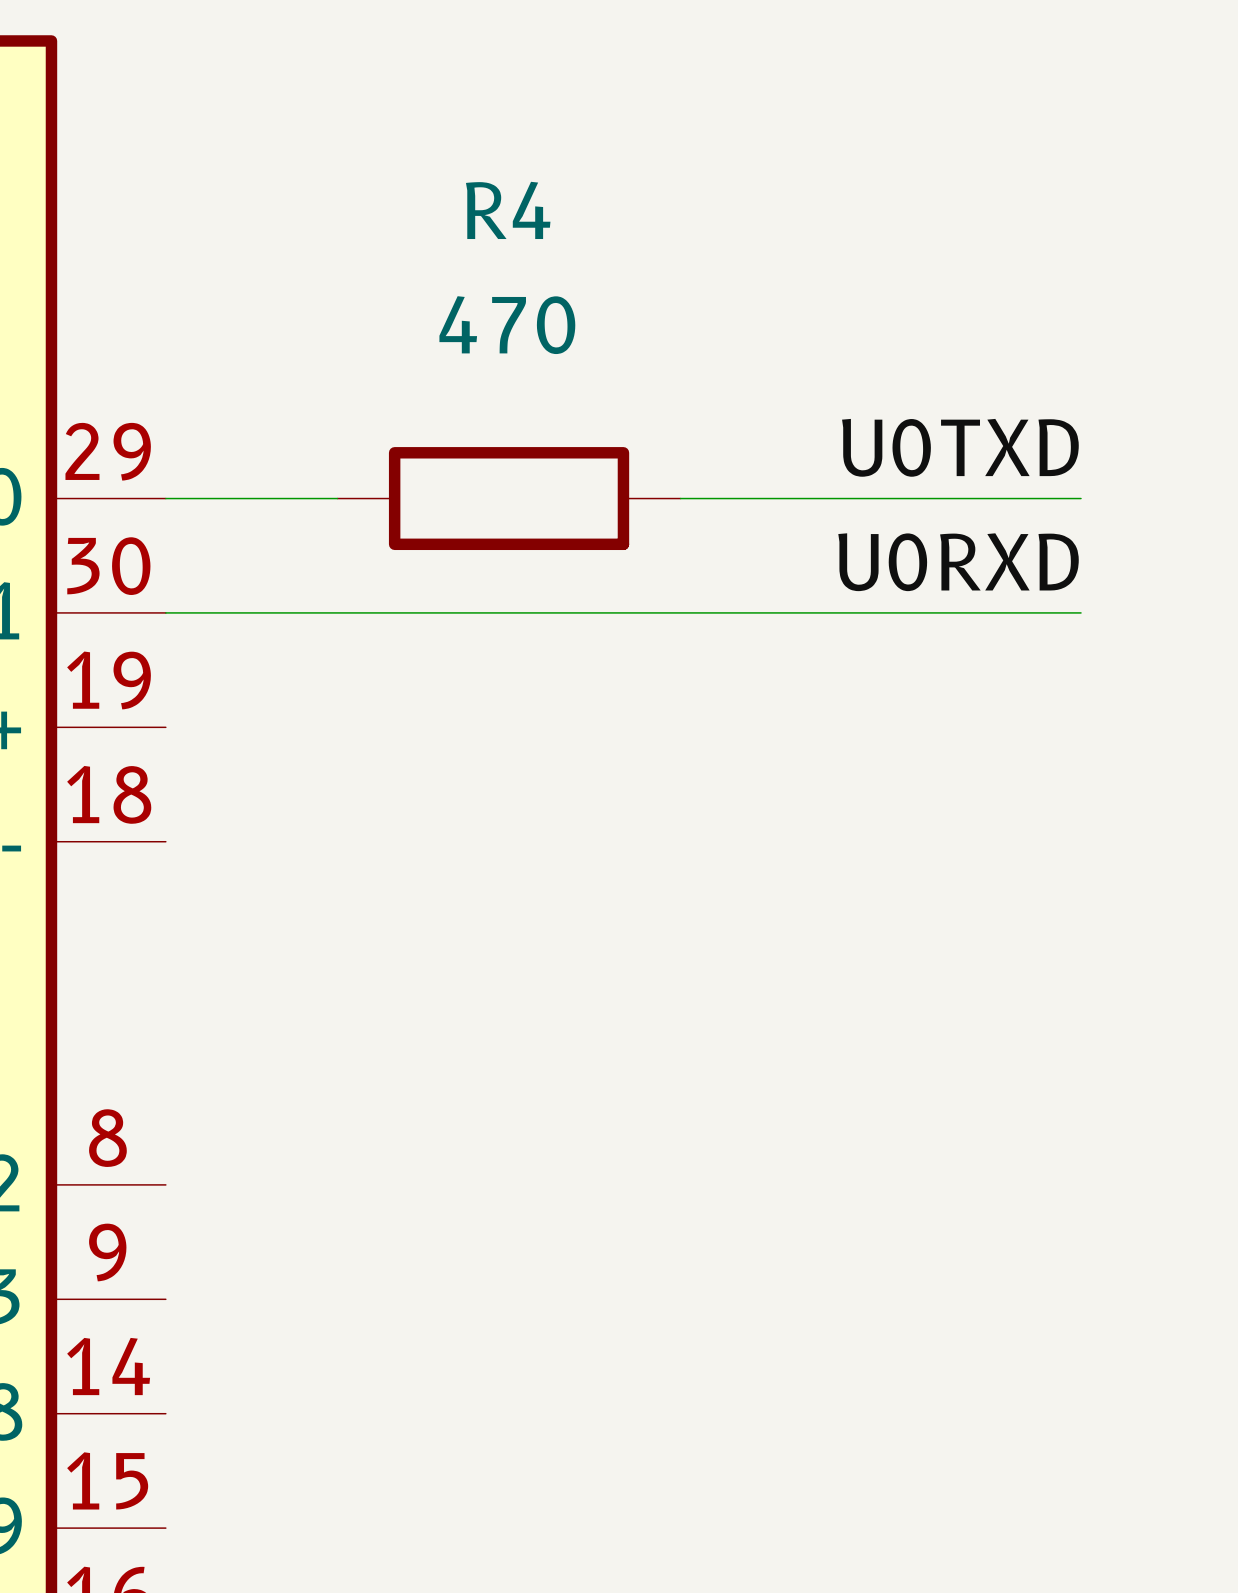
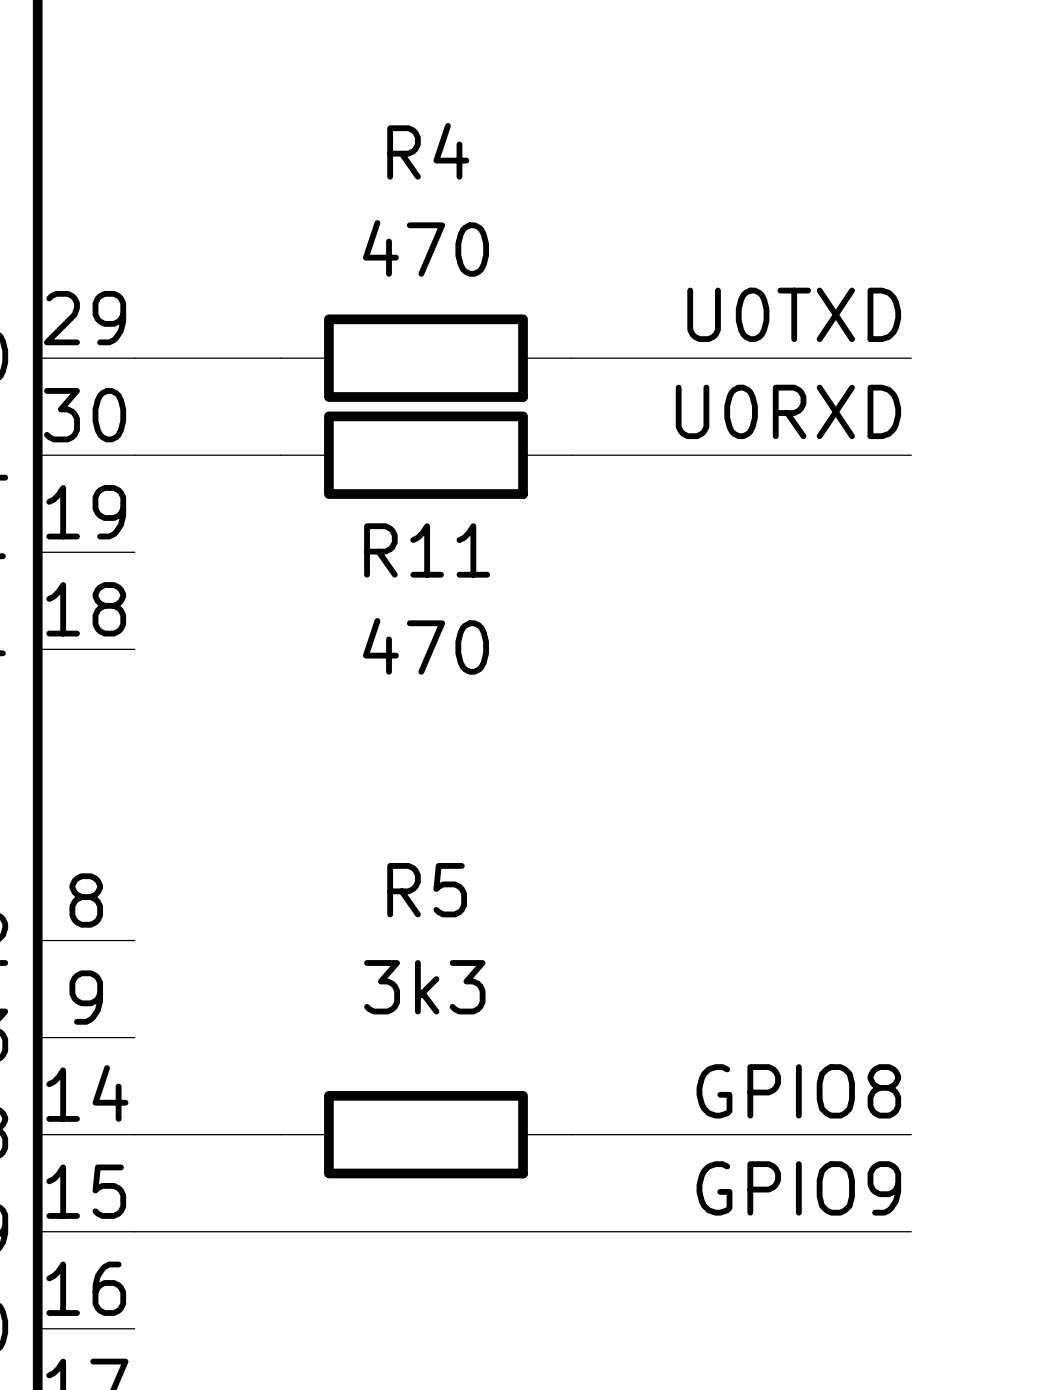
R4 name position: R4 (508, 210) -> R4 (428, 151)
R4 value position: 470 (507, 325) -> 470 (425, 248)
wire: (337, 612) (680, 612) -> none
R11: none -> 470 (425, 455)
label: none -> GPIO8 (798, 1091)
wire: none -> (134, 1134) (280, 1134)
R5: none -> 3k3 (425, 1134)
wire: none -> (571, 1134) (911, 1134)
label: none -> GPIO9 (798, 1188)
wire: none -> (134, 1231) (911, 1231)

